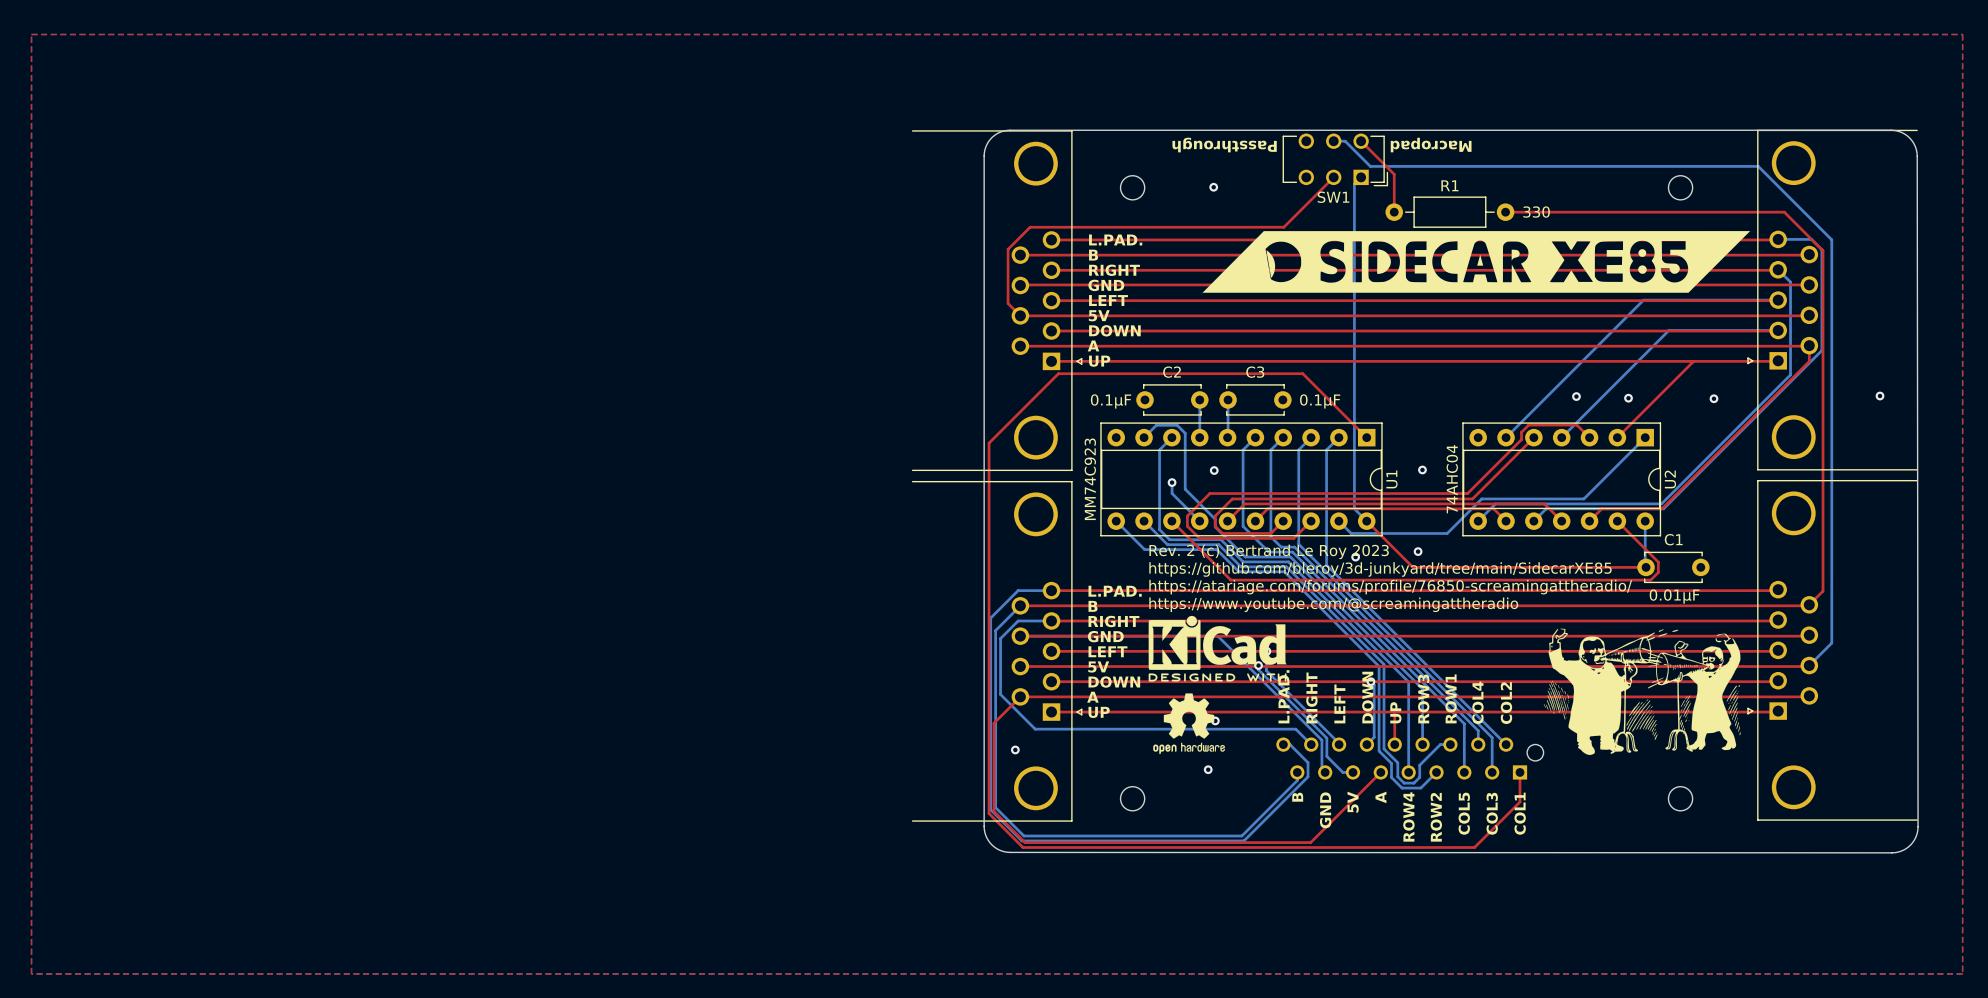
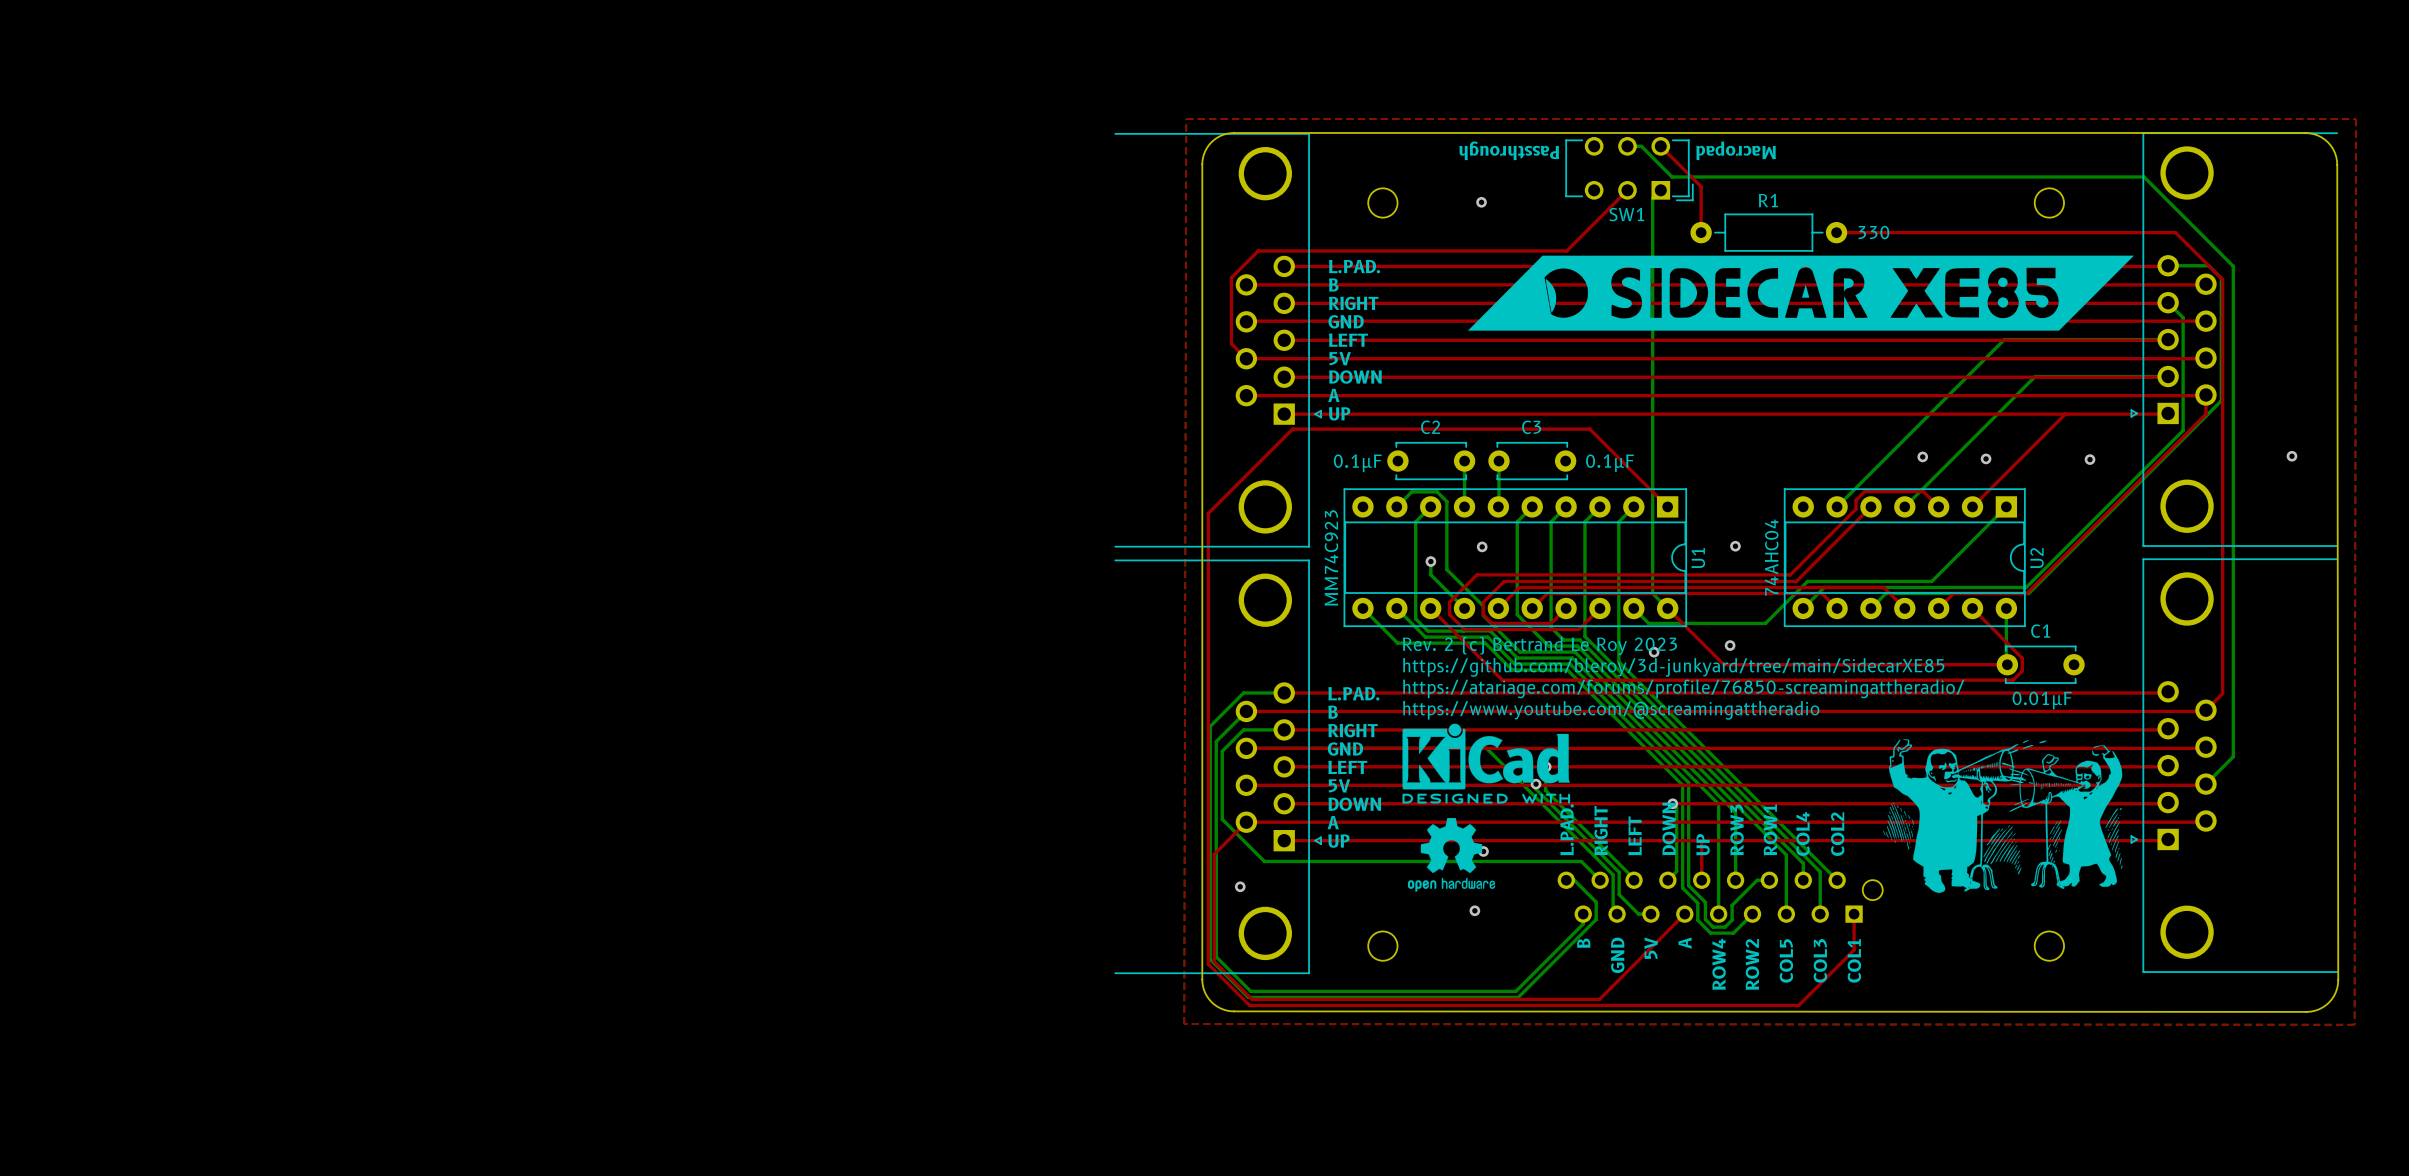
top zone outline: (31, 34) (1962, 34) (1962, 973) (31, 973) (31, 34) -> none
top zone outline: none -> (1186, 119) (2355, 119) (2354, 1024) (1184, 1024) (1186, 119)

